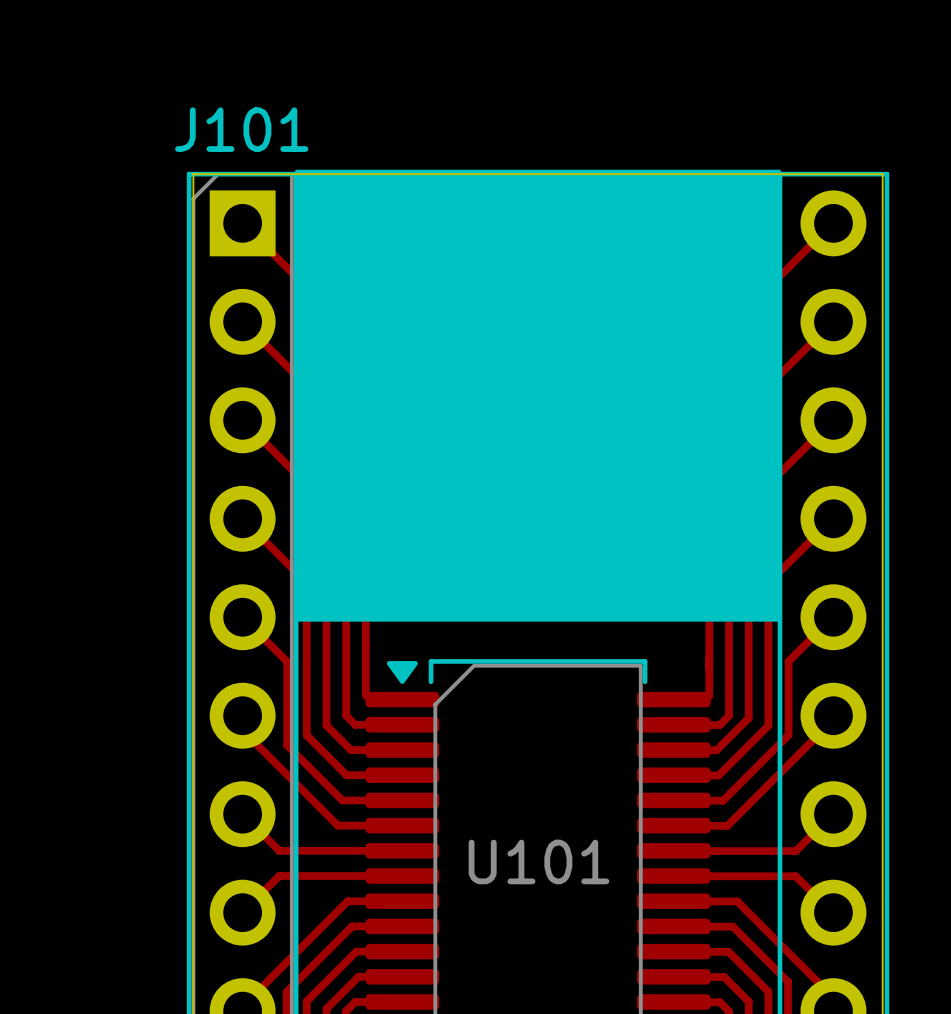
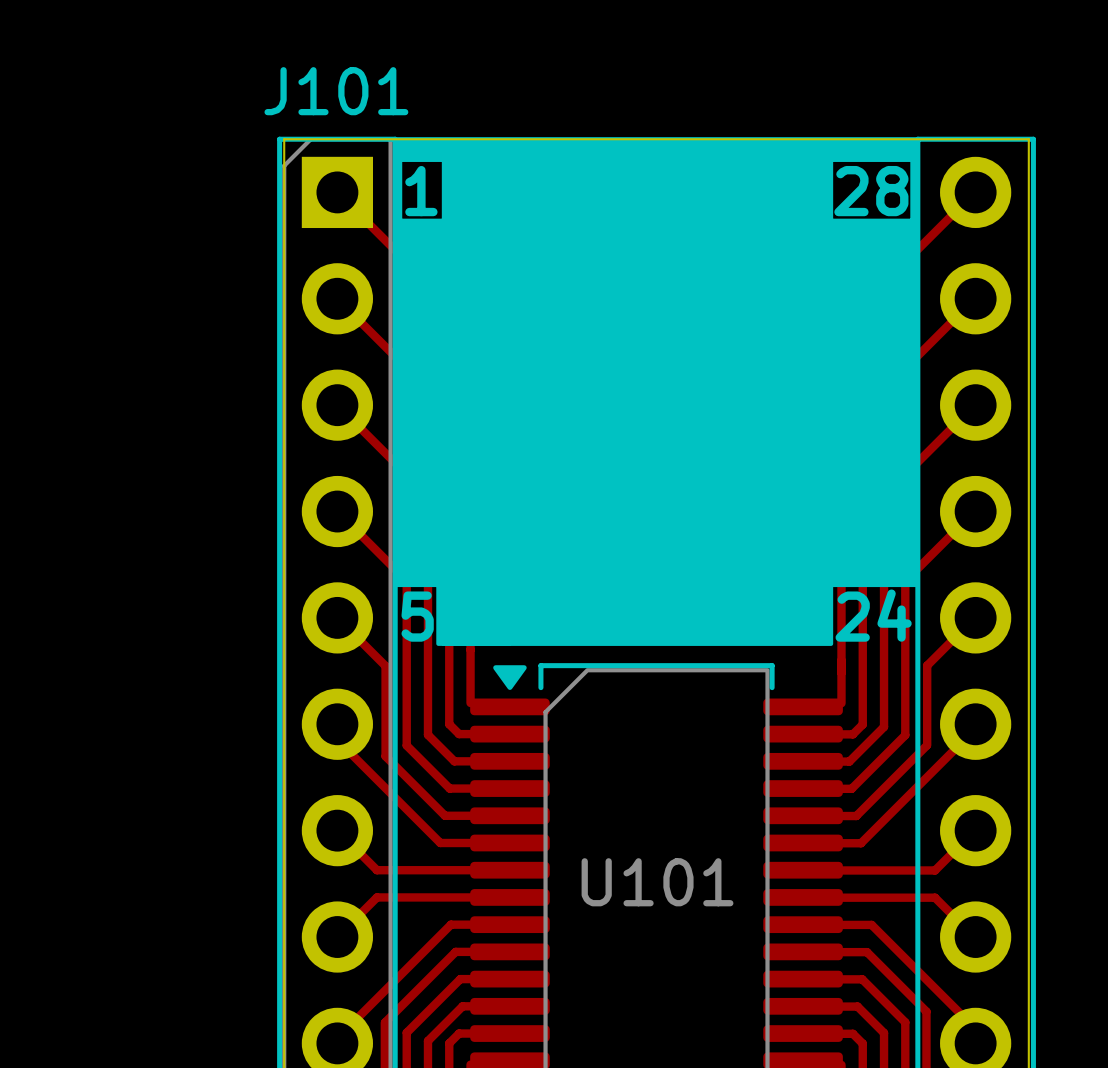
drawing: [294, 169, 782, 622] -> none
drawing: none -> [393, 137, 920, 646]
text: none -> 1 (421, 191)
text: none -> 28 (871, 191)
text: none -> 24 (873, 615)
text: none -> 5 (417, 616)

